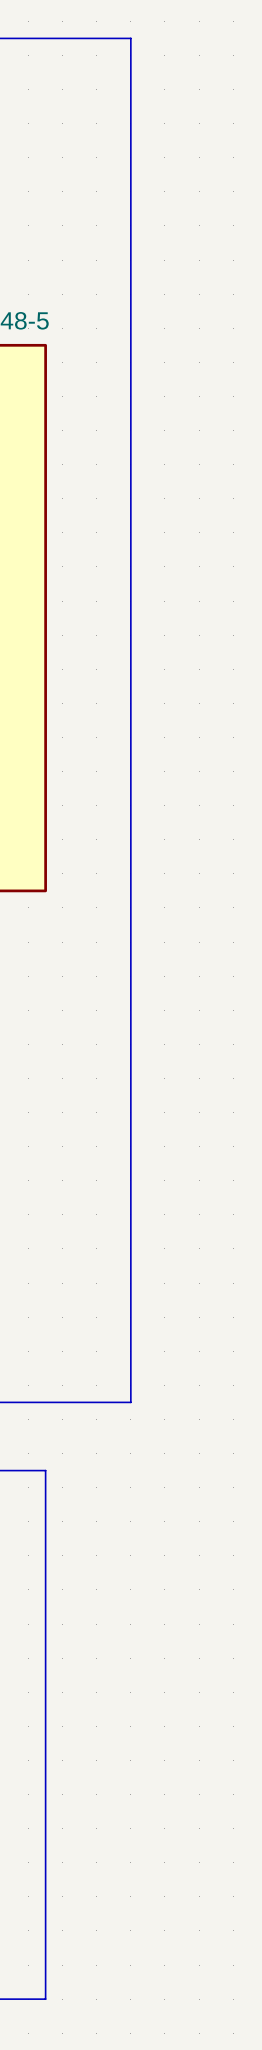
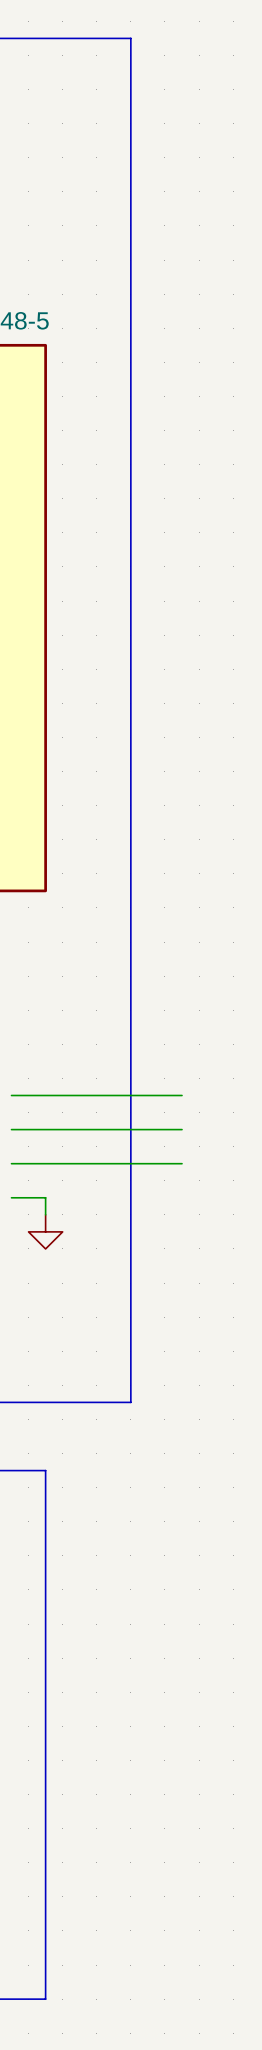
wire: none -> (11, 1095) (182, 1095)
wire: none -> (11, 1129) (182, 1129)
wire: none -> (11, 1163) (182, 1163)
wire: none -> (11, 1197) (45, 1197) (45, 1214)
power symbol: none -> (45, 1231)

